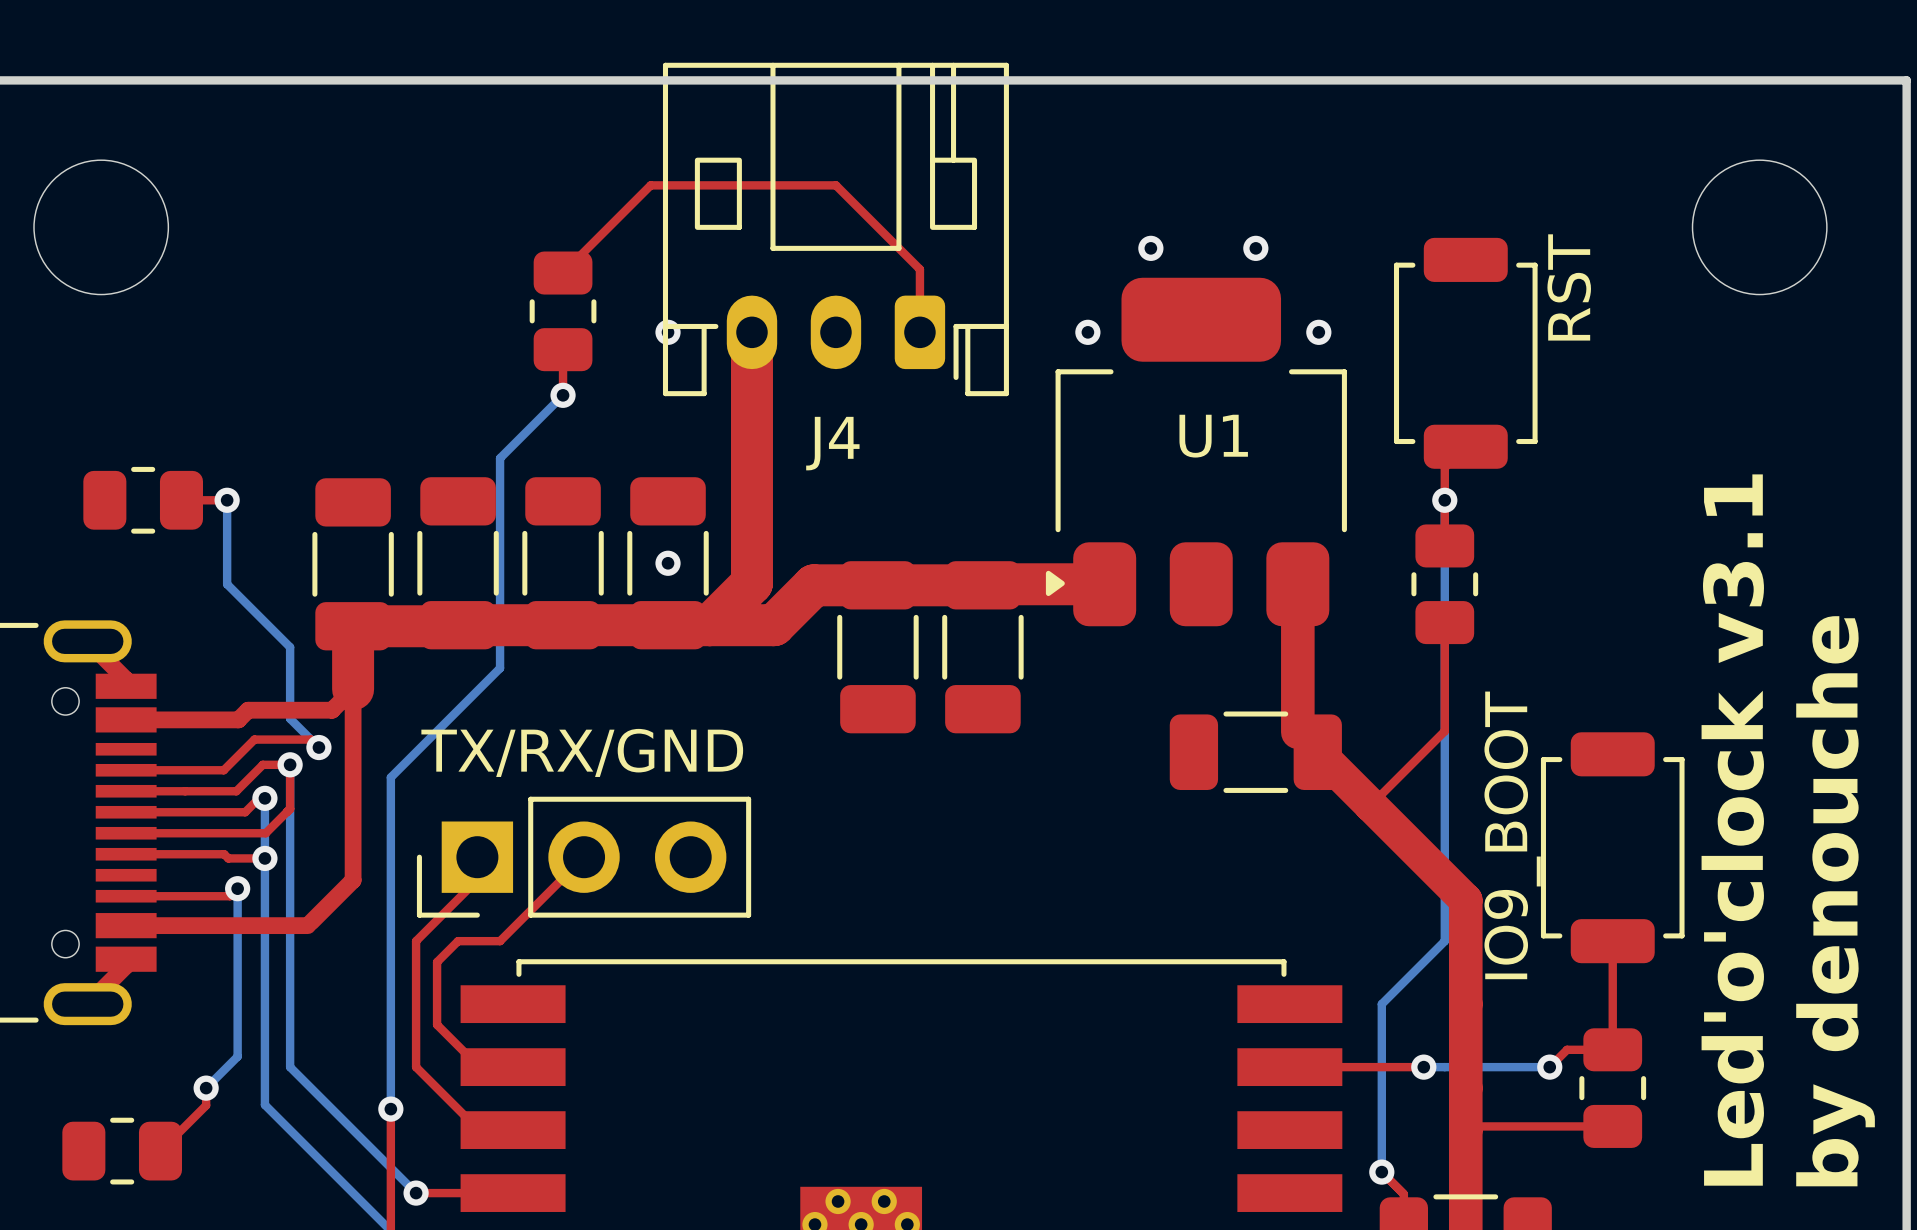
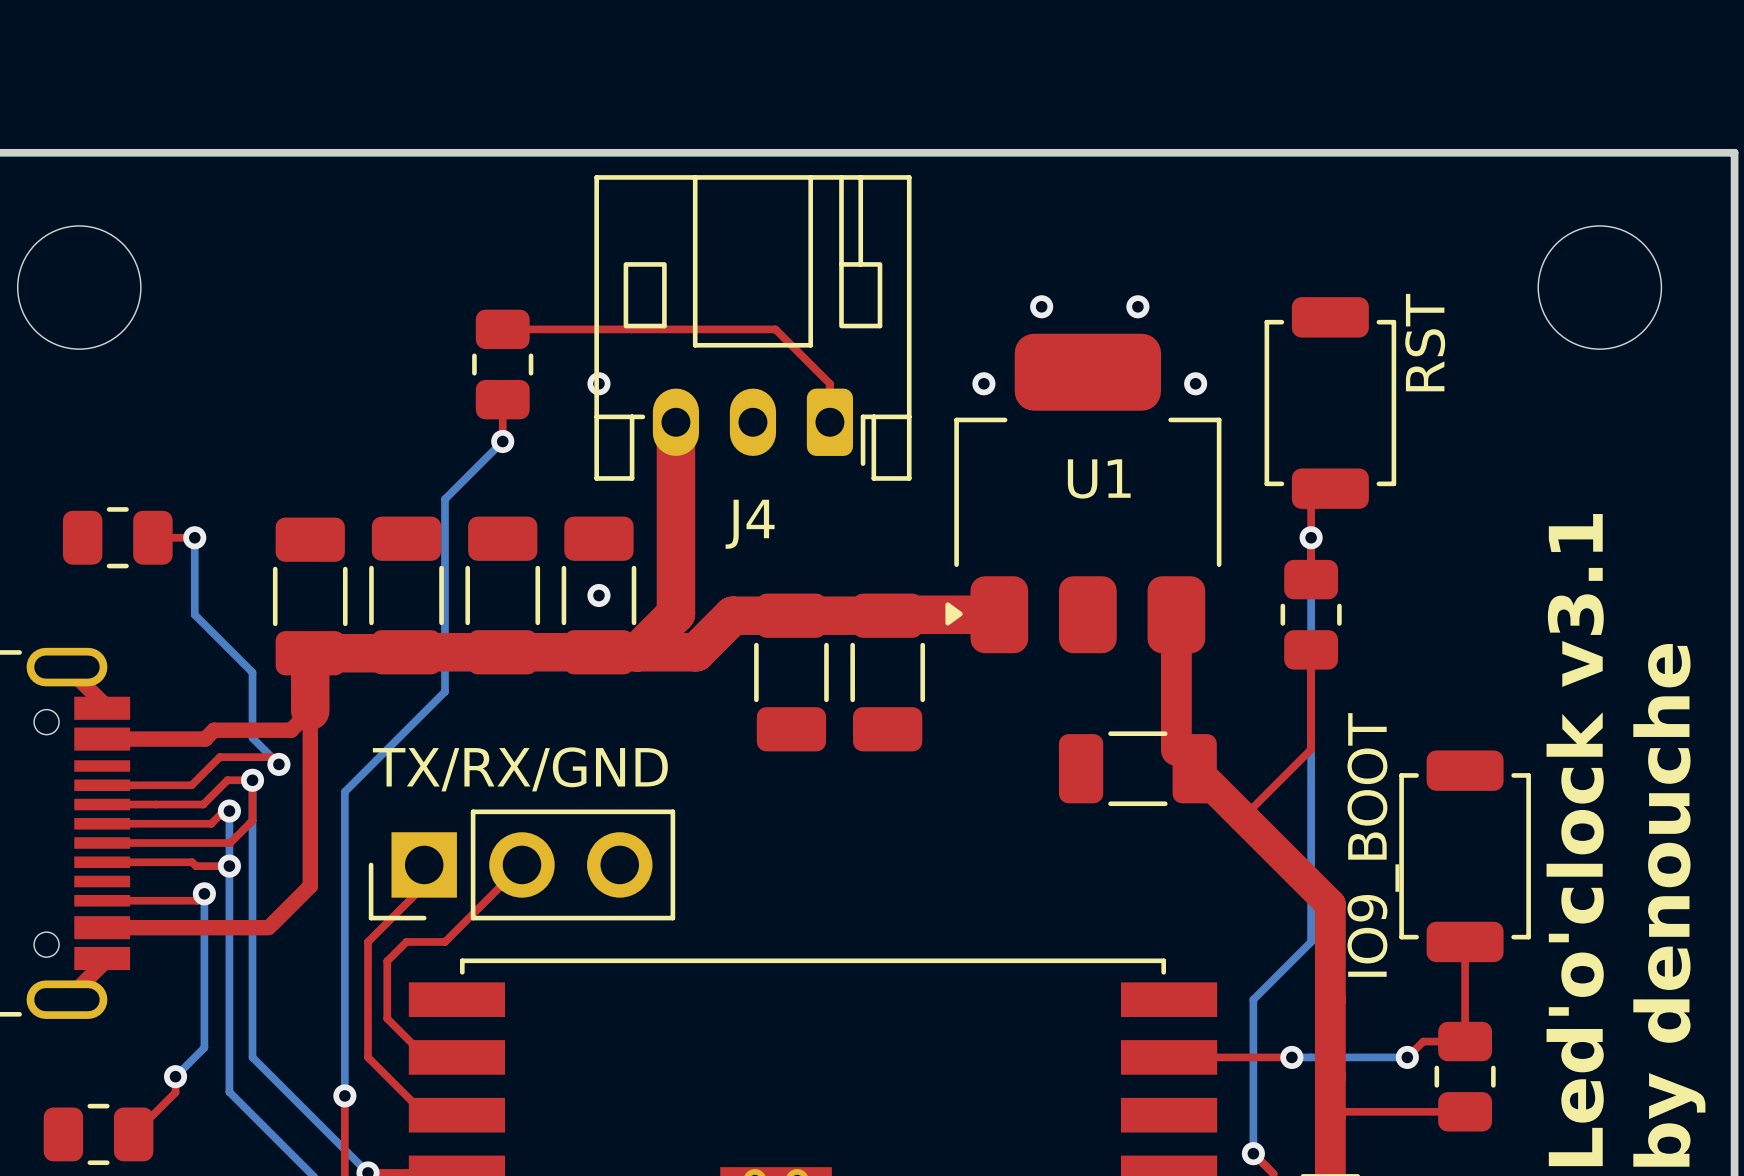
J4 position: (835, 229) -> (752, 327)
top track: (563, 273) (650, 185) (835, 185) (919, 269) (919, 332) -> (502, 329) (775, 329) (829, 383) (829, 422)

